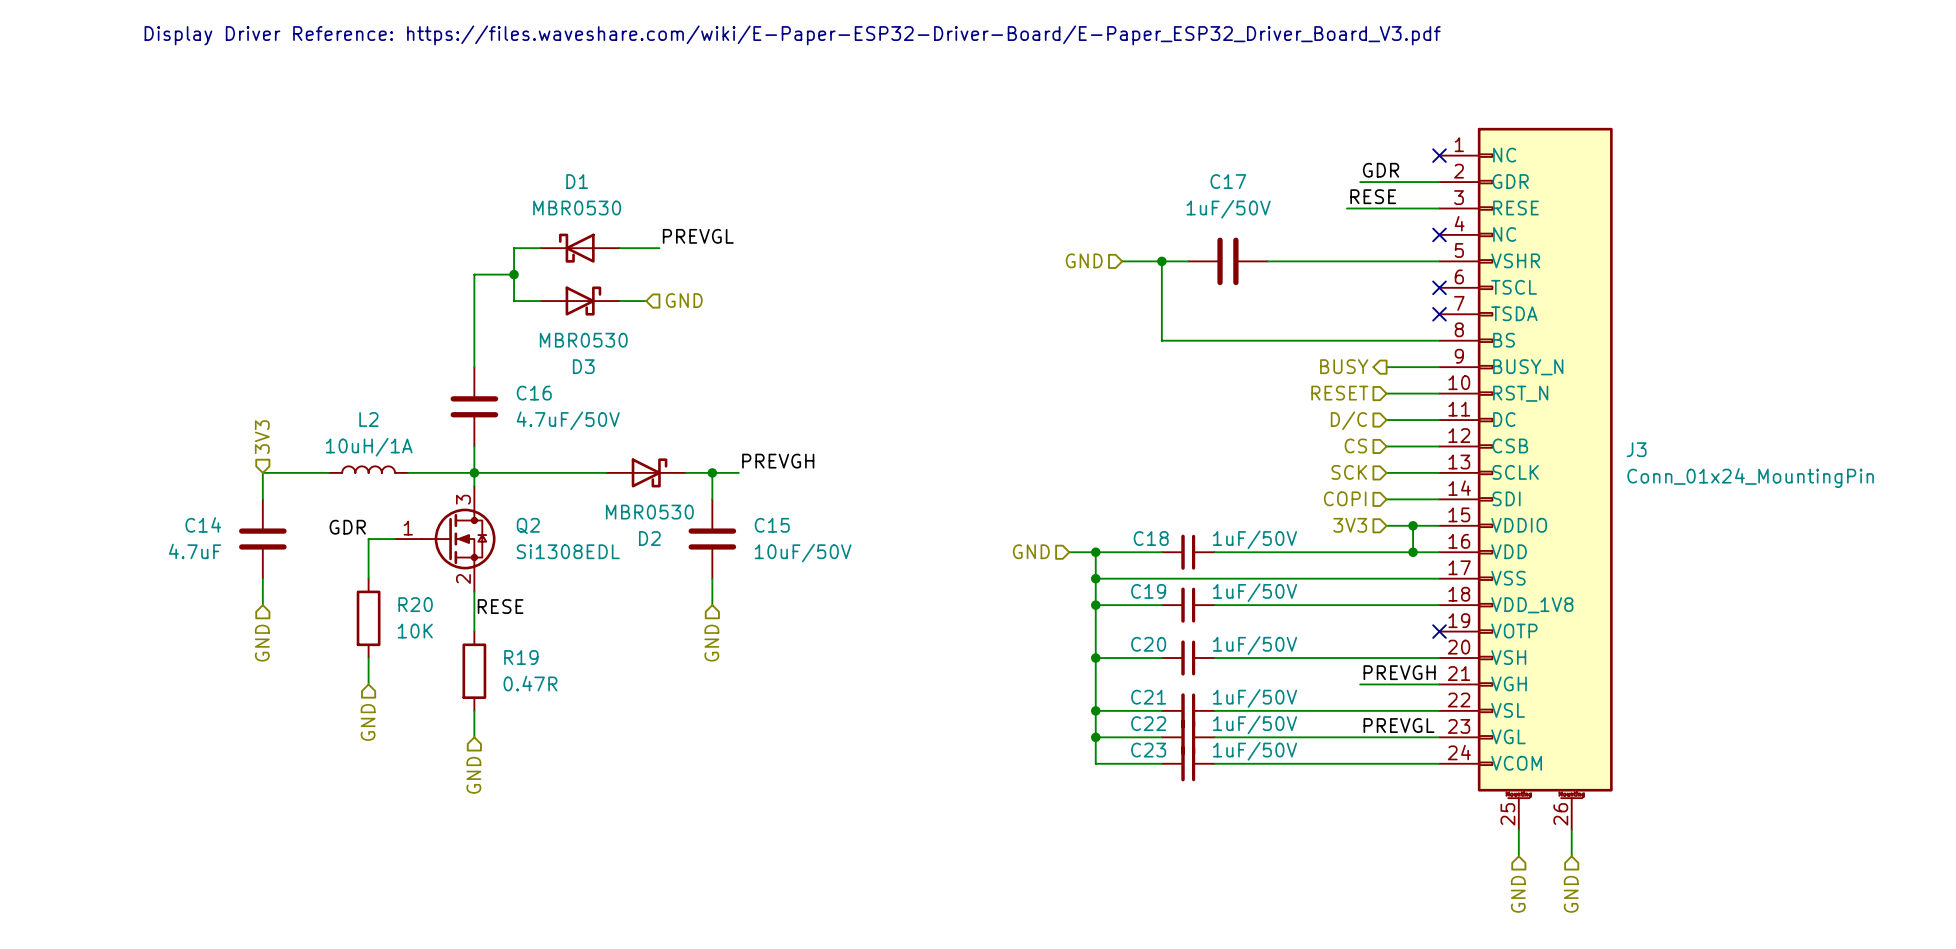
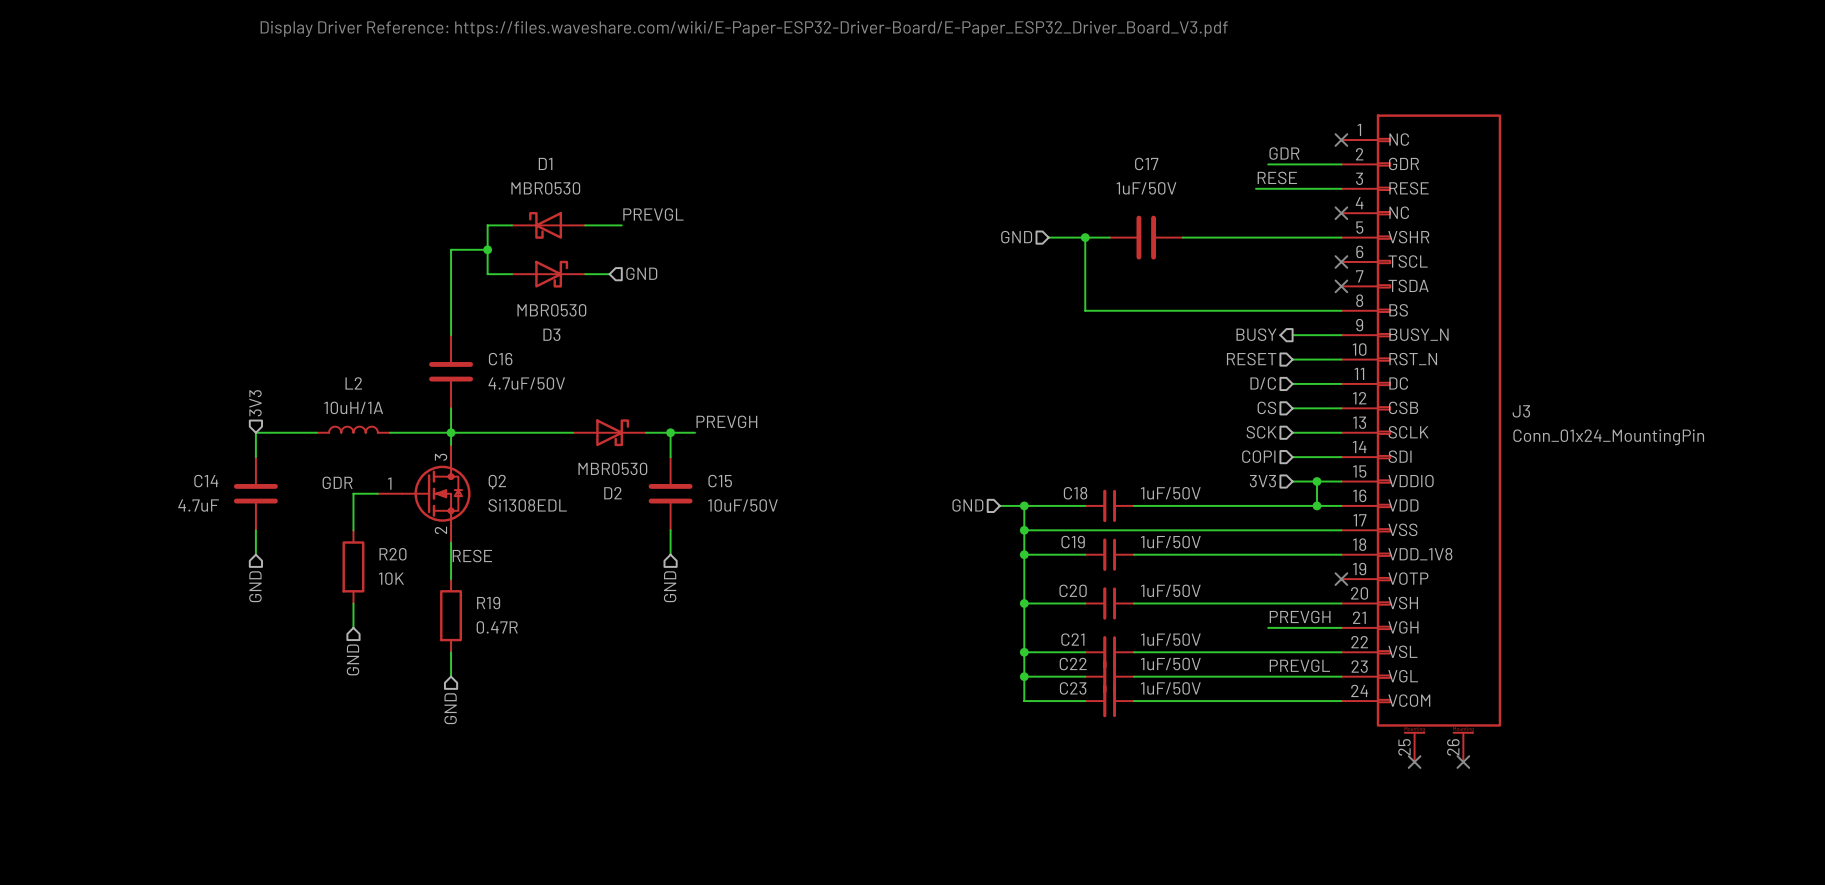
wire: (1518, 829) (1518, 856) -> none
no-connect mark: none -> (1414, 762)
wire: (1571, 829) (1571, 856) -> none
no-connect mark: none -> (1463, 762)
hierarchical label: GND (1518, 894) -> none
hierarchical label: GND (1571, 894) -> none

